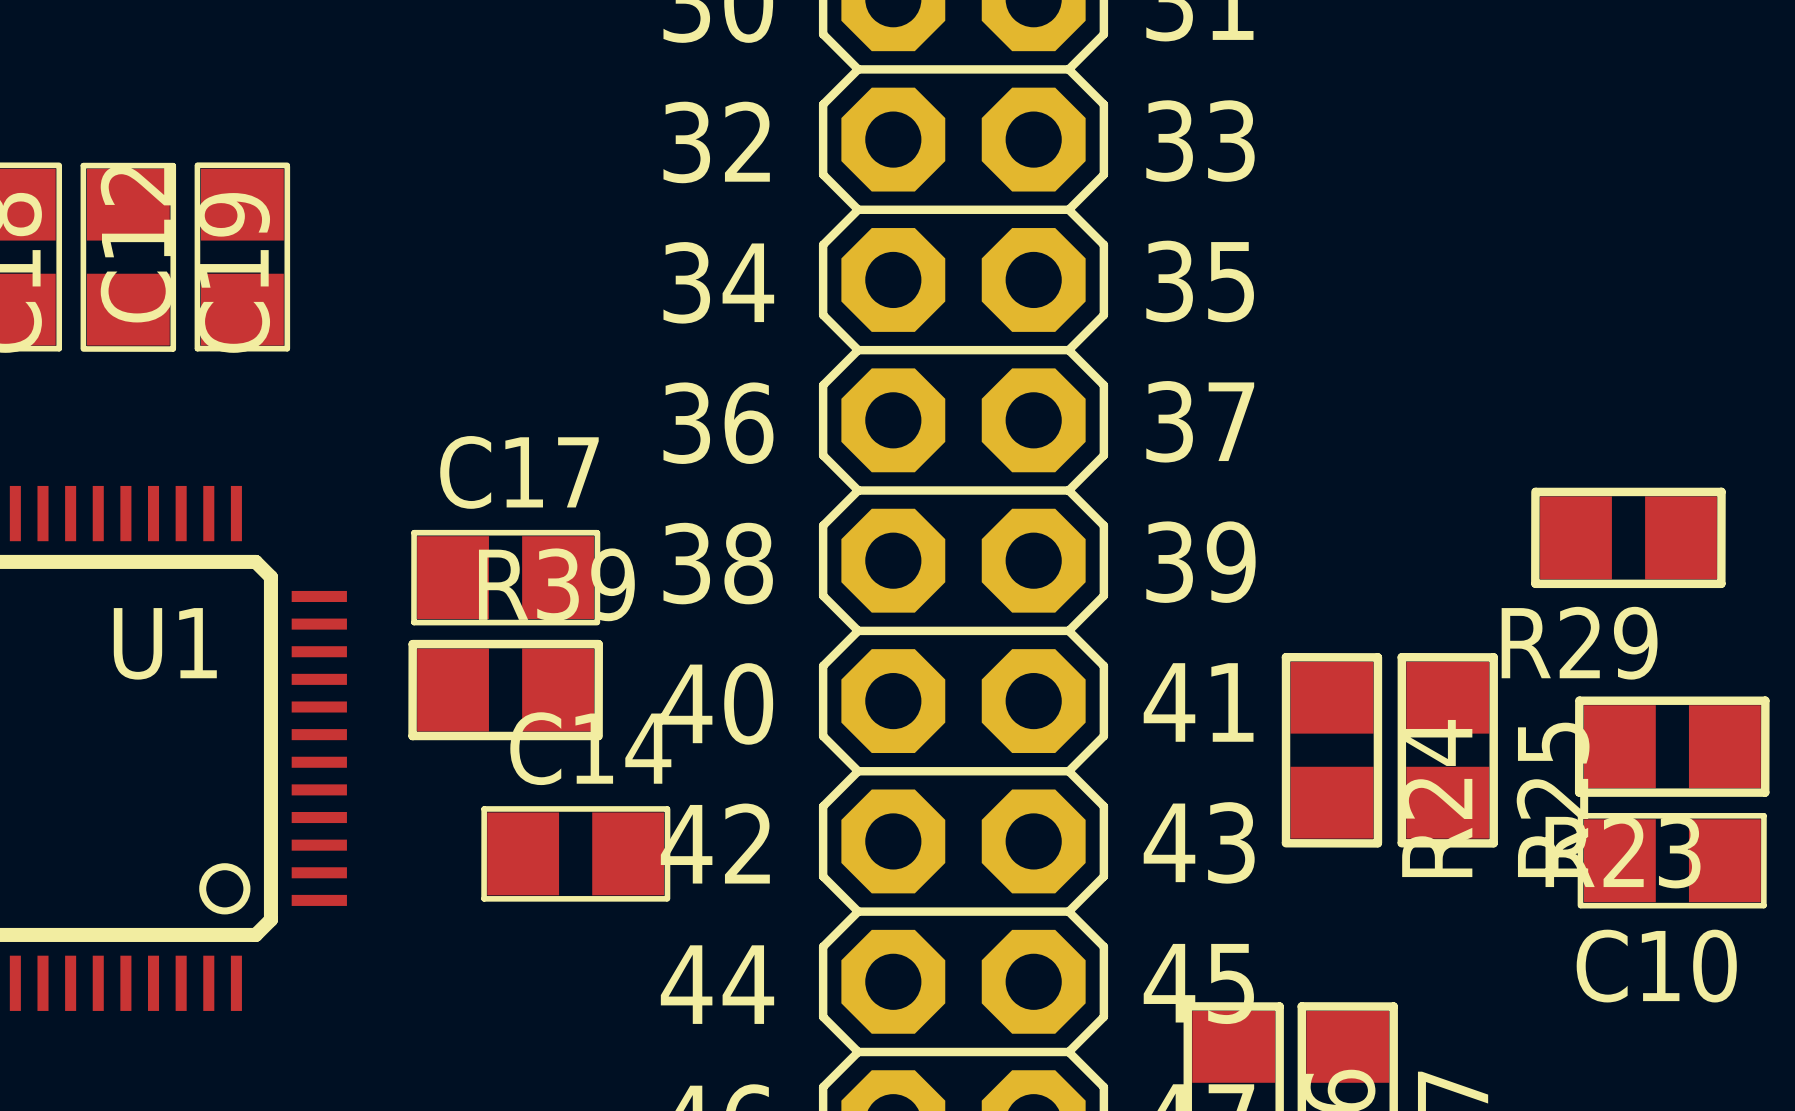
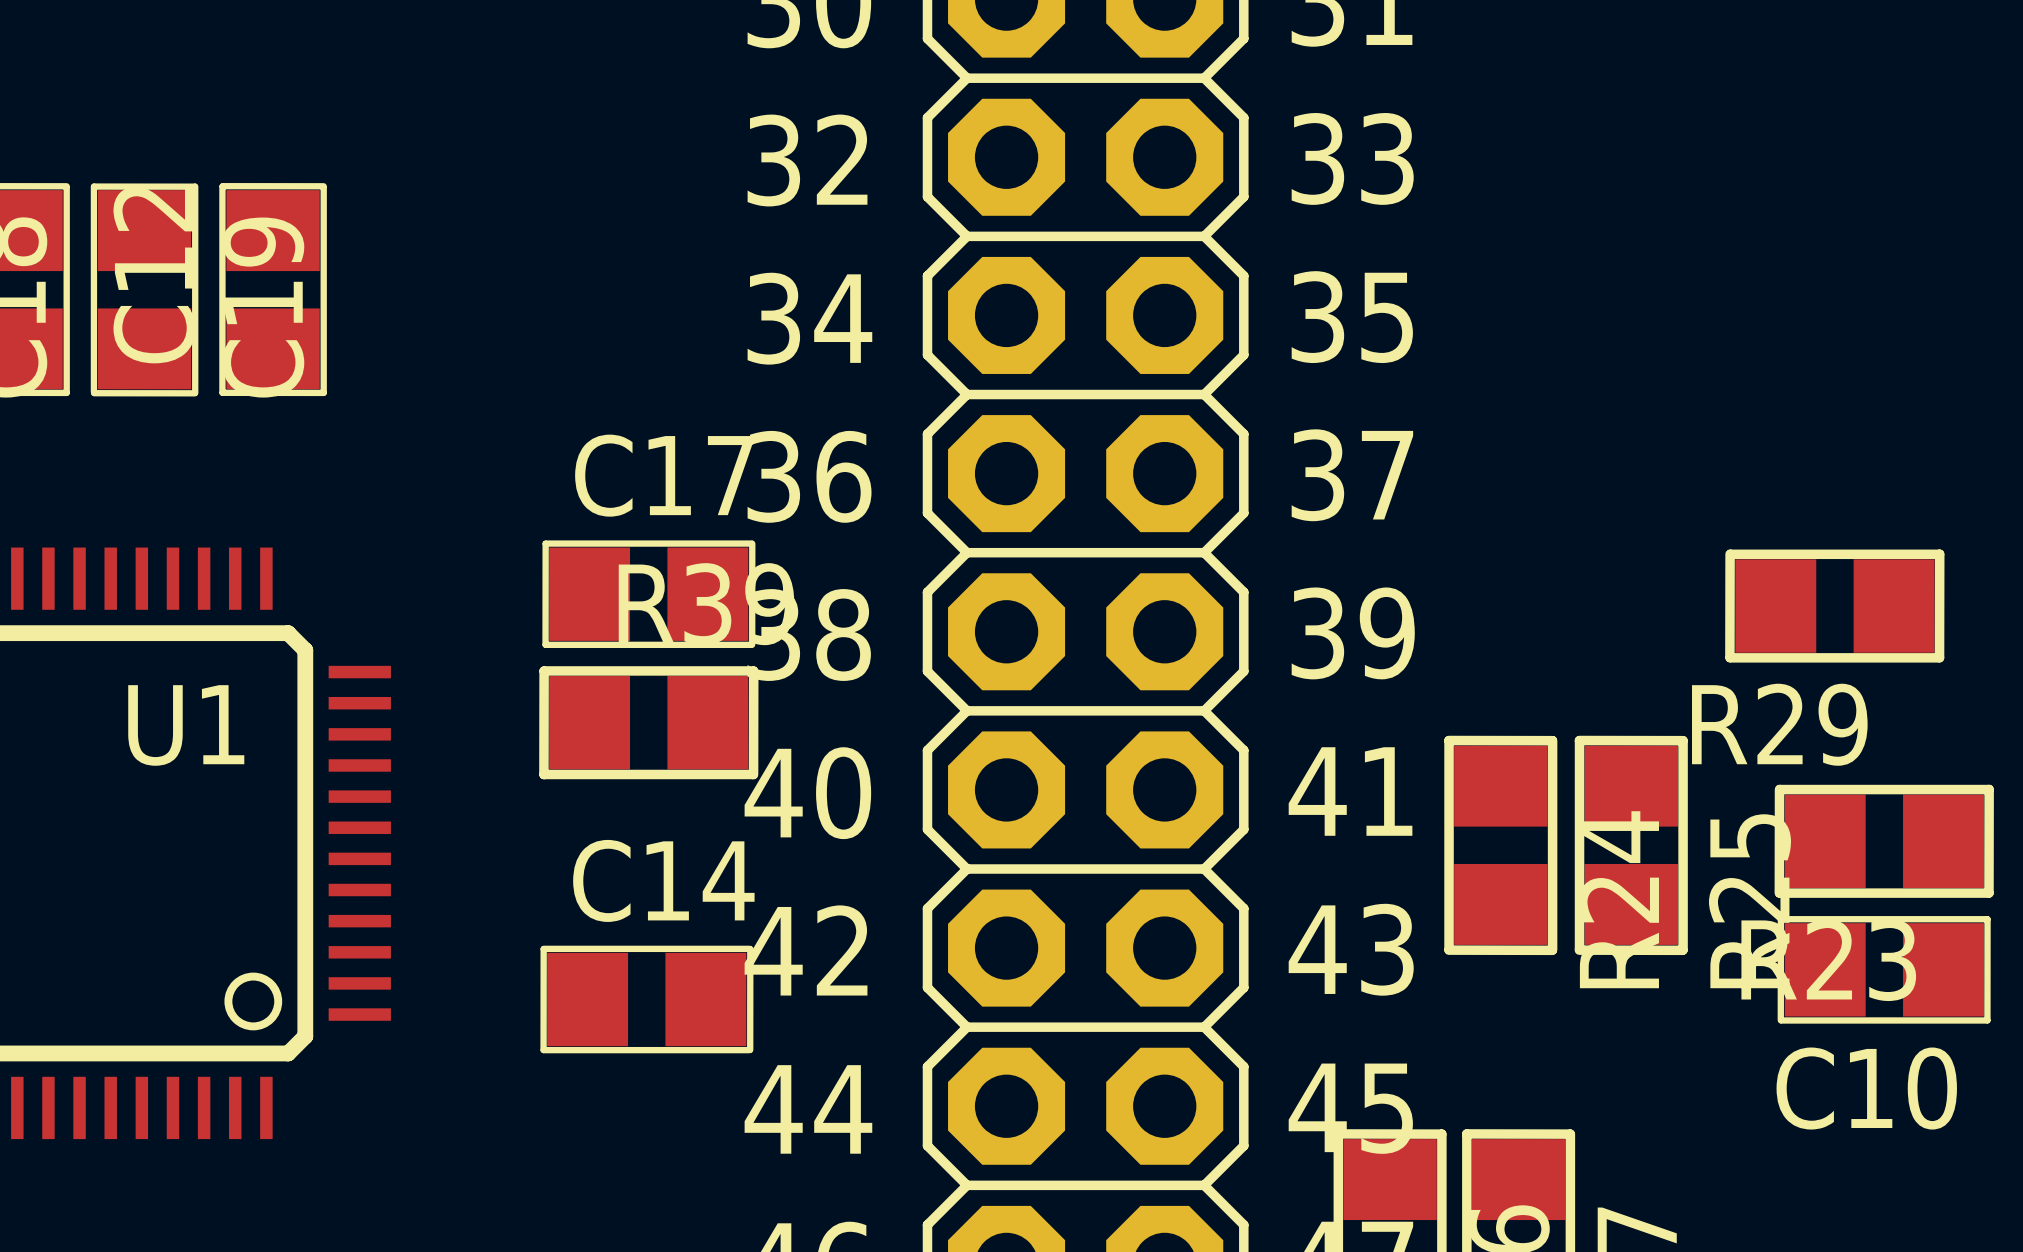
C17 position: (505, 577) -> (648, 594)
R39 position: (505, 690) -> (648, 722)
C14 position: (575, 853) -> (646, 999)

